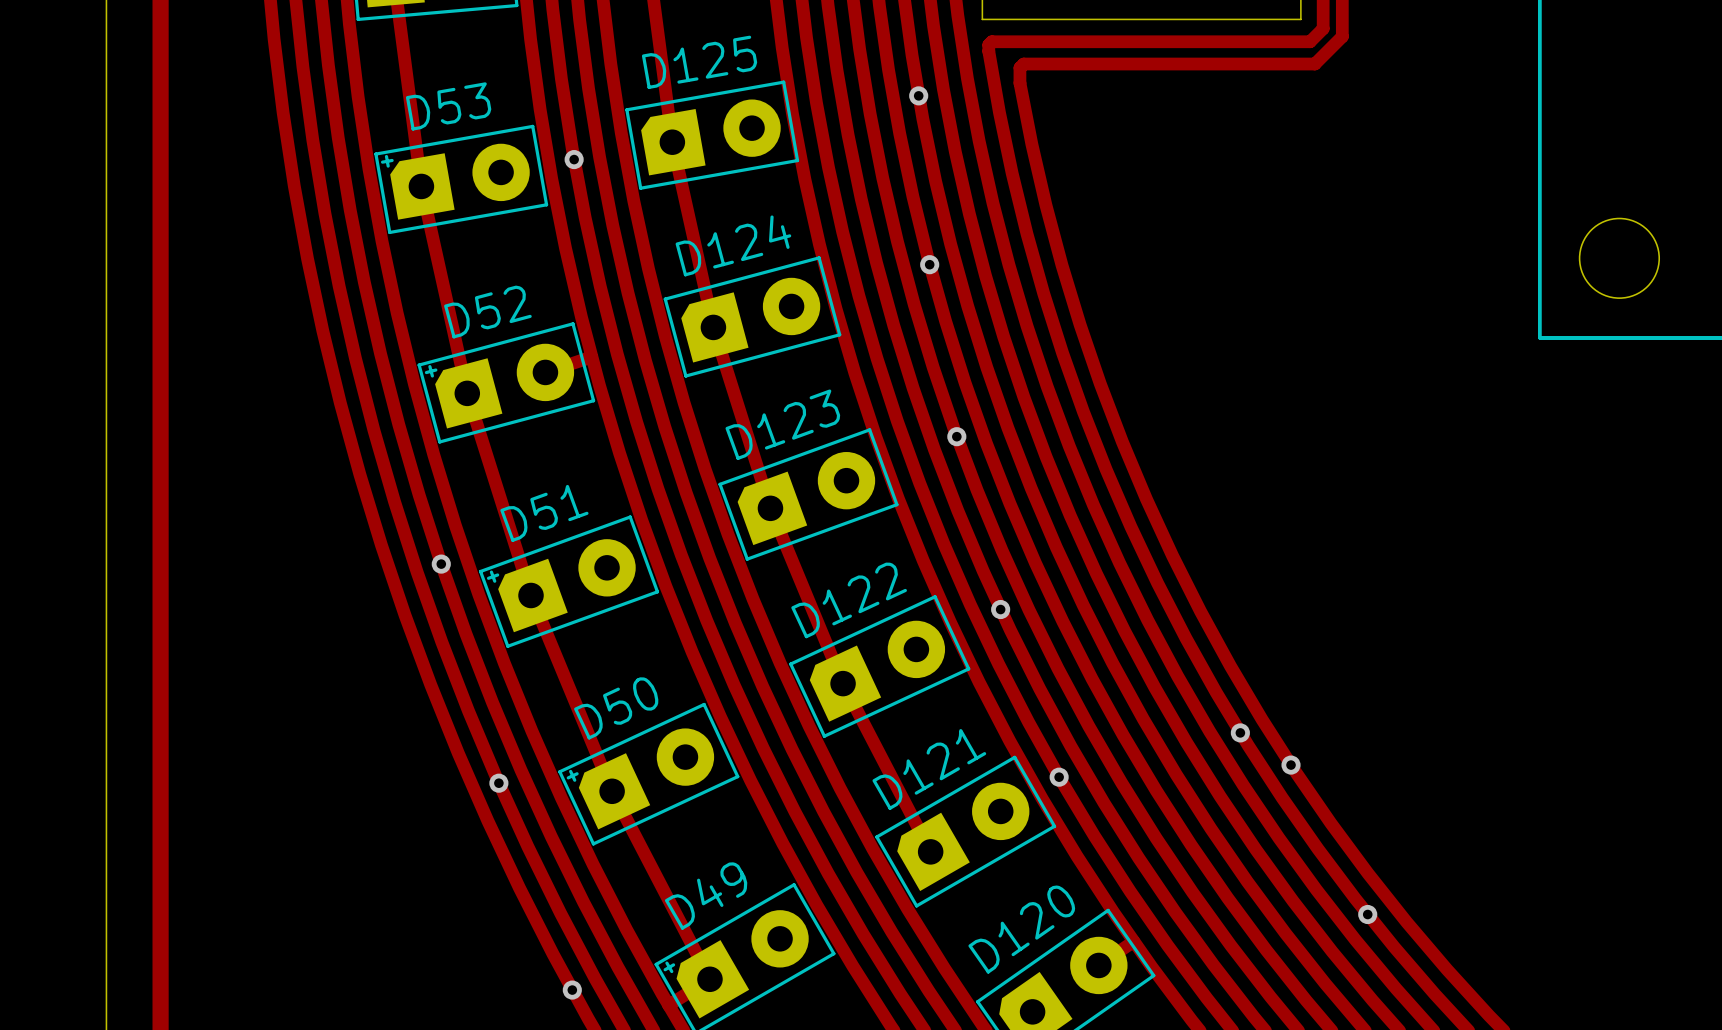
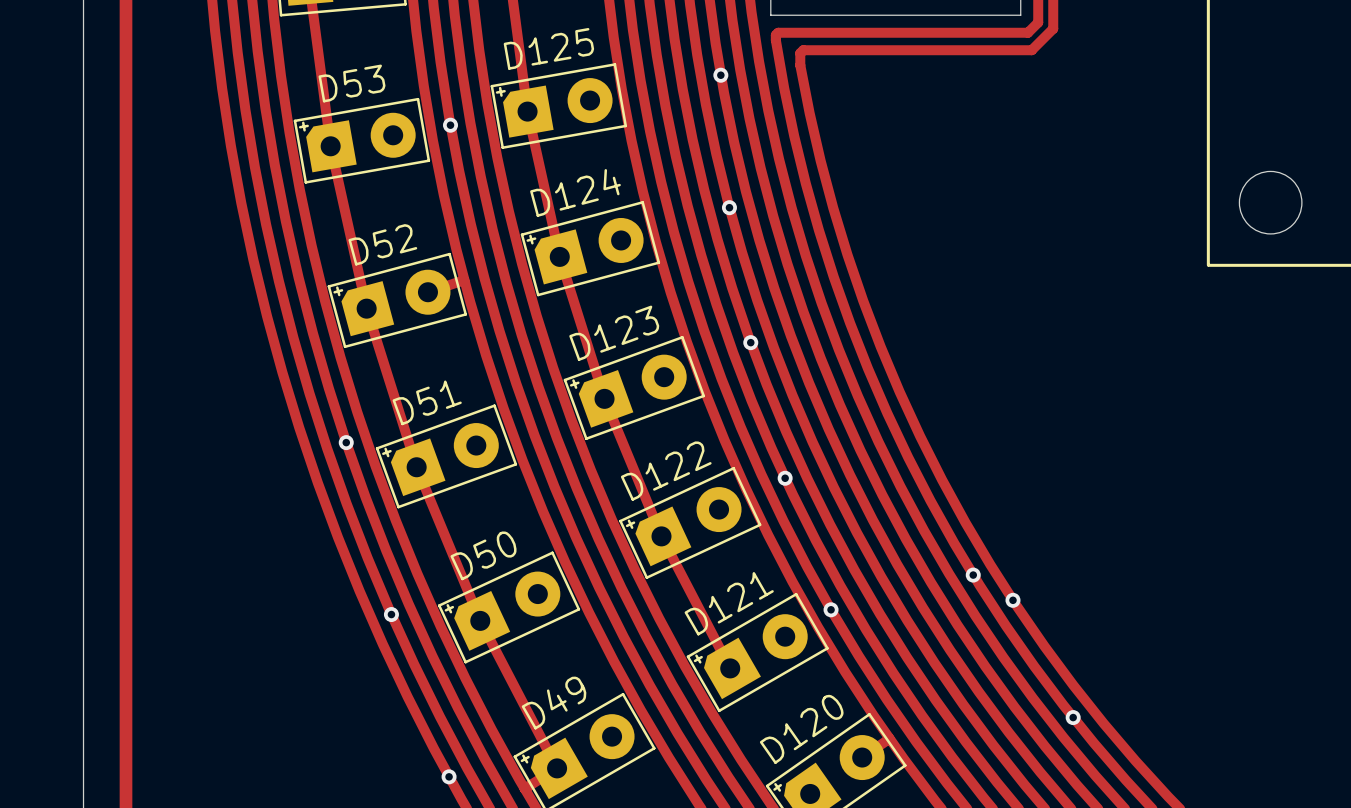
D125 text: none -> + (500, 91)
D124 text: none -> + (531, 239)
D123 text: none -> + (574, 384)
D122 text: none -> + (630, 524)
D121 text: none -> + (698, 659)
D120 text: none -> + (777, 787)

